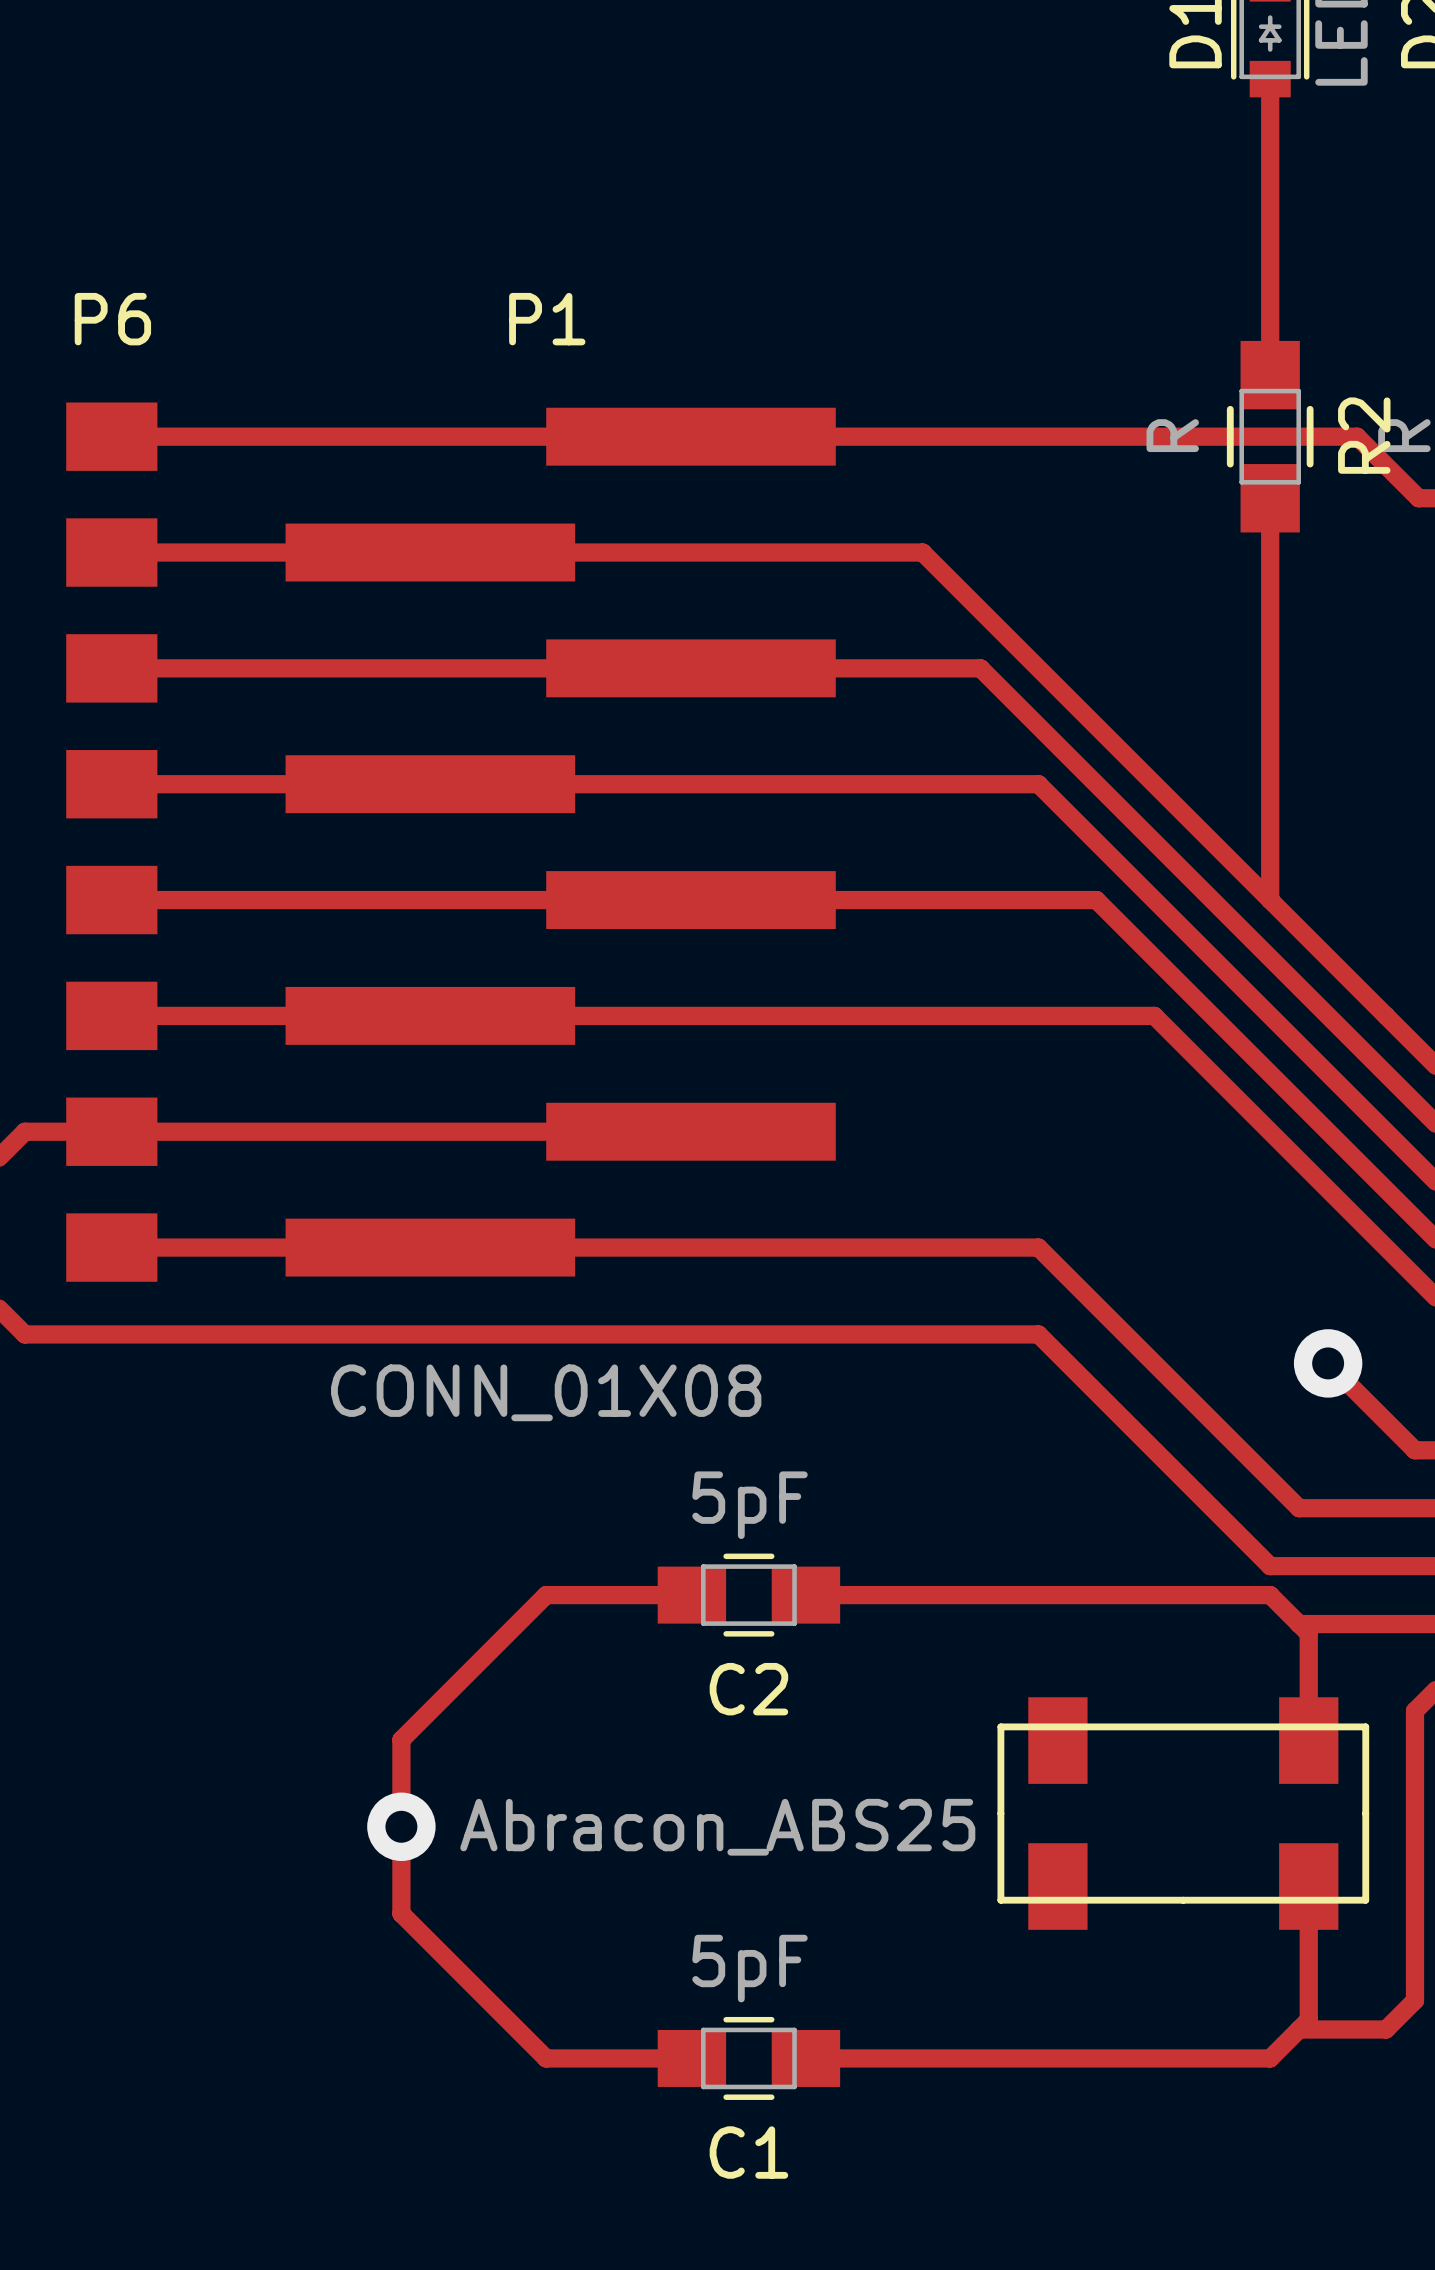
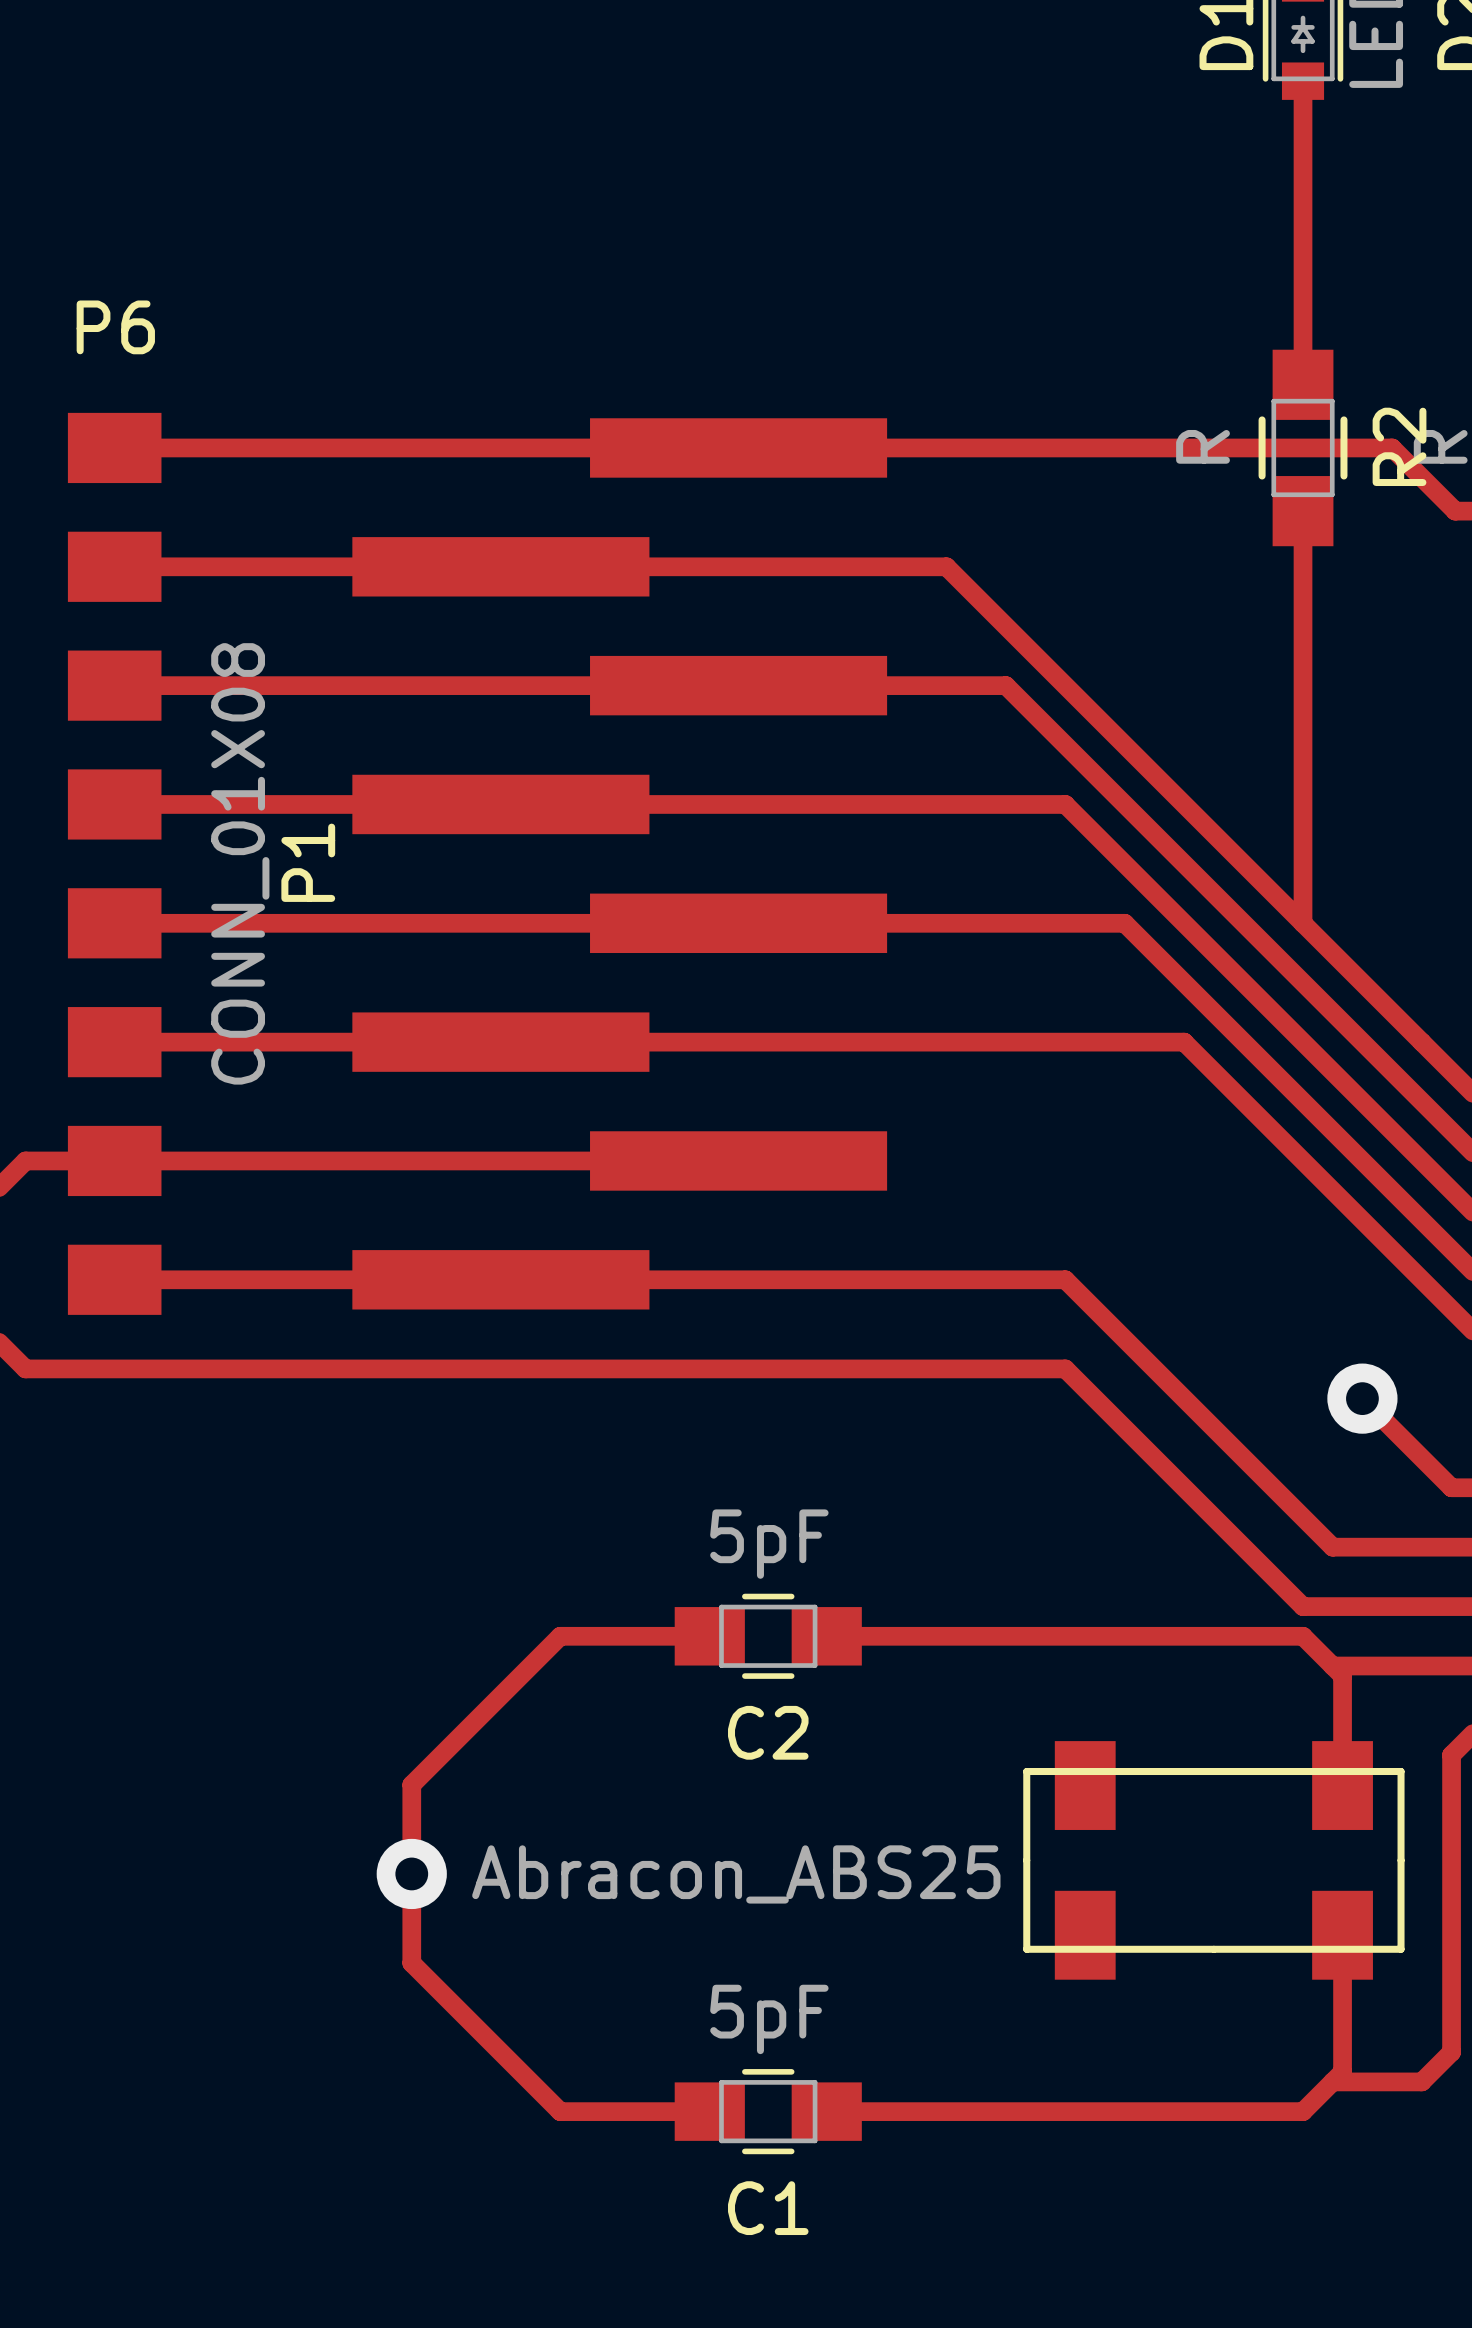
P1 name position: P1 (547, 319) -> P1 (308, 862)
P1 footprint: [285, 407, 836, 1277] -> [352, 418, 888, 1310]
P1 value position: CONN_01X08 (546, 1392) -> CONN_01X08 (240, 863)

